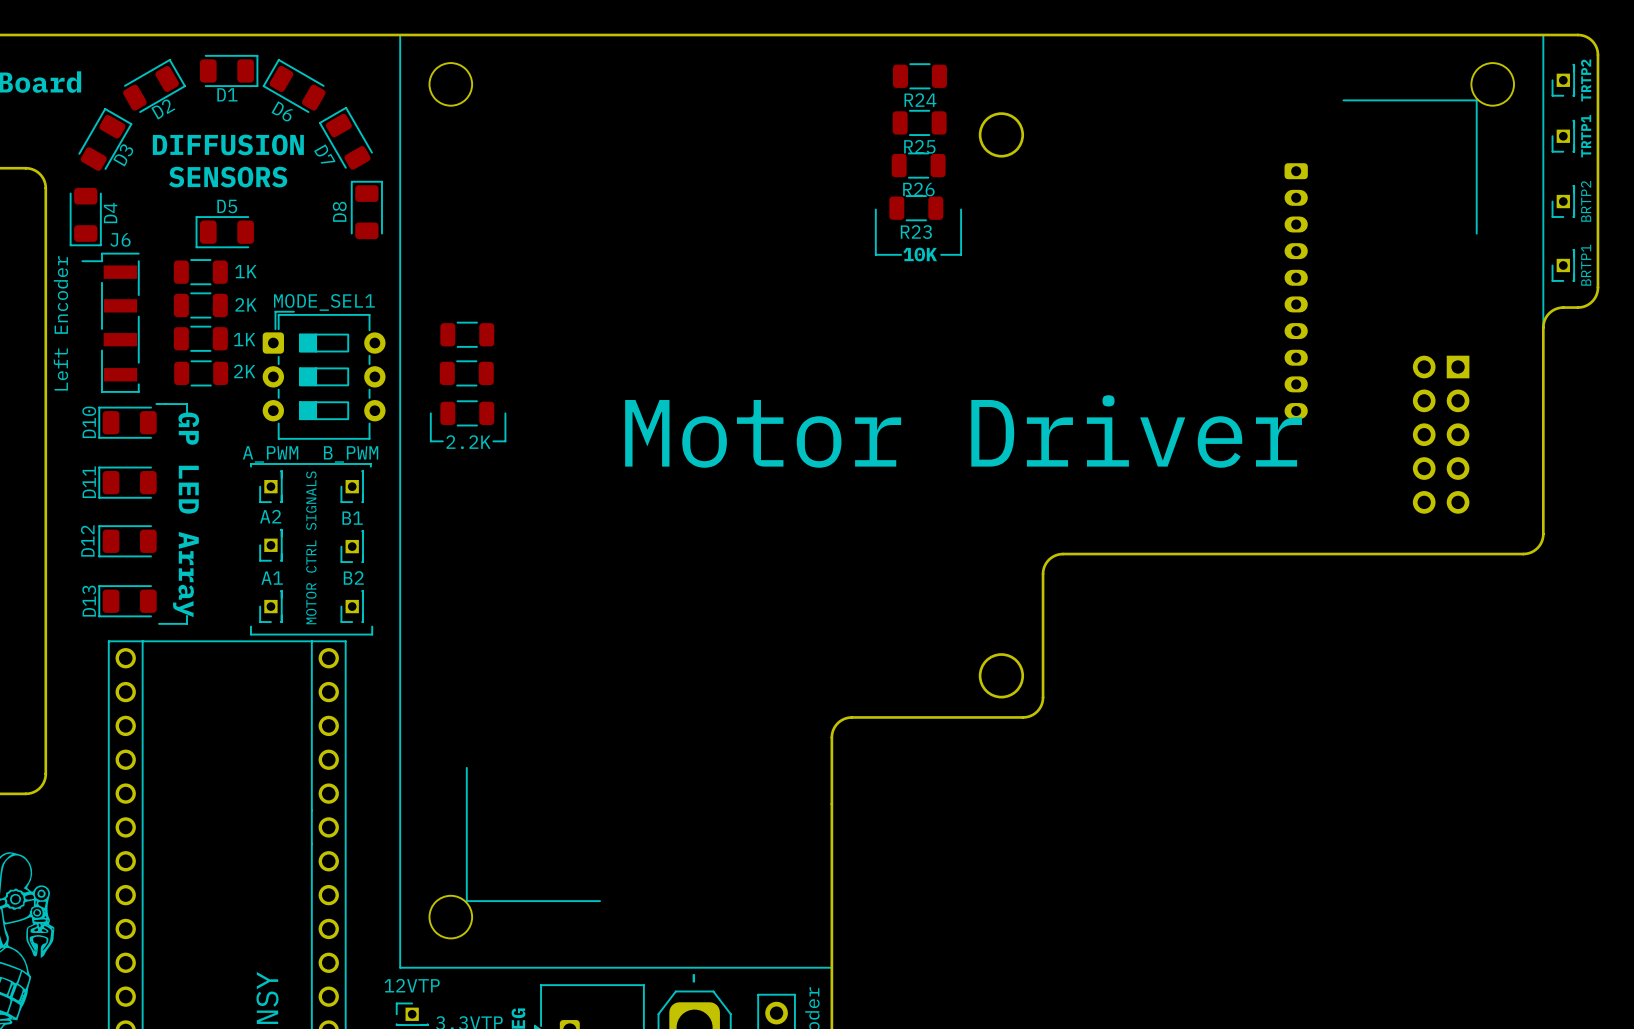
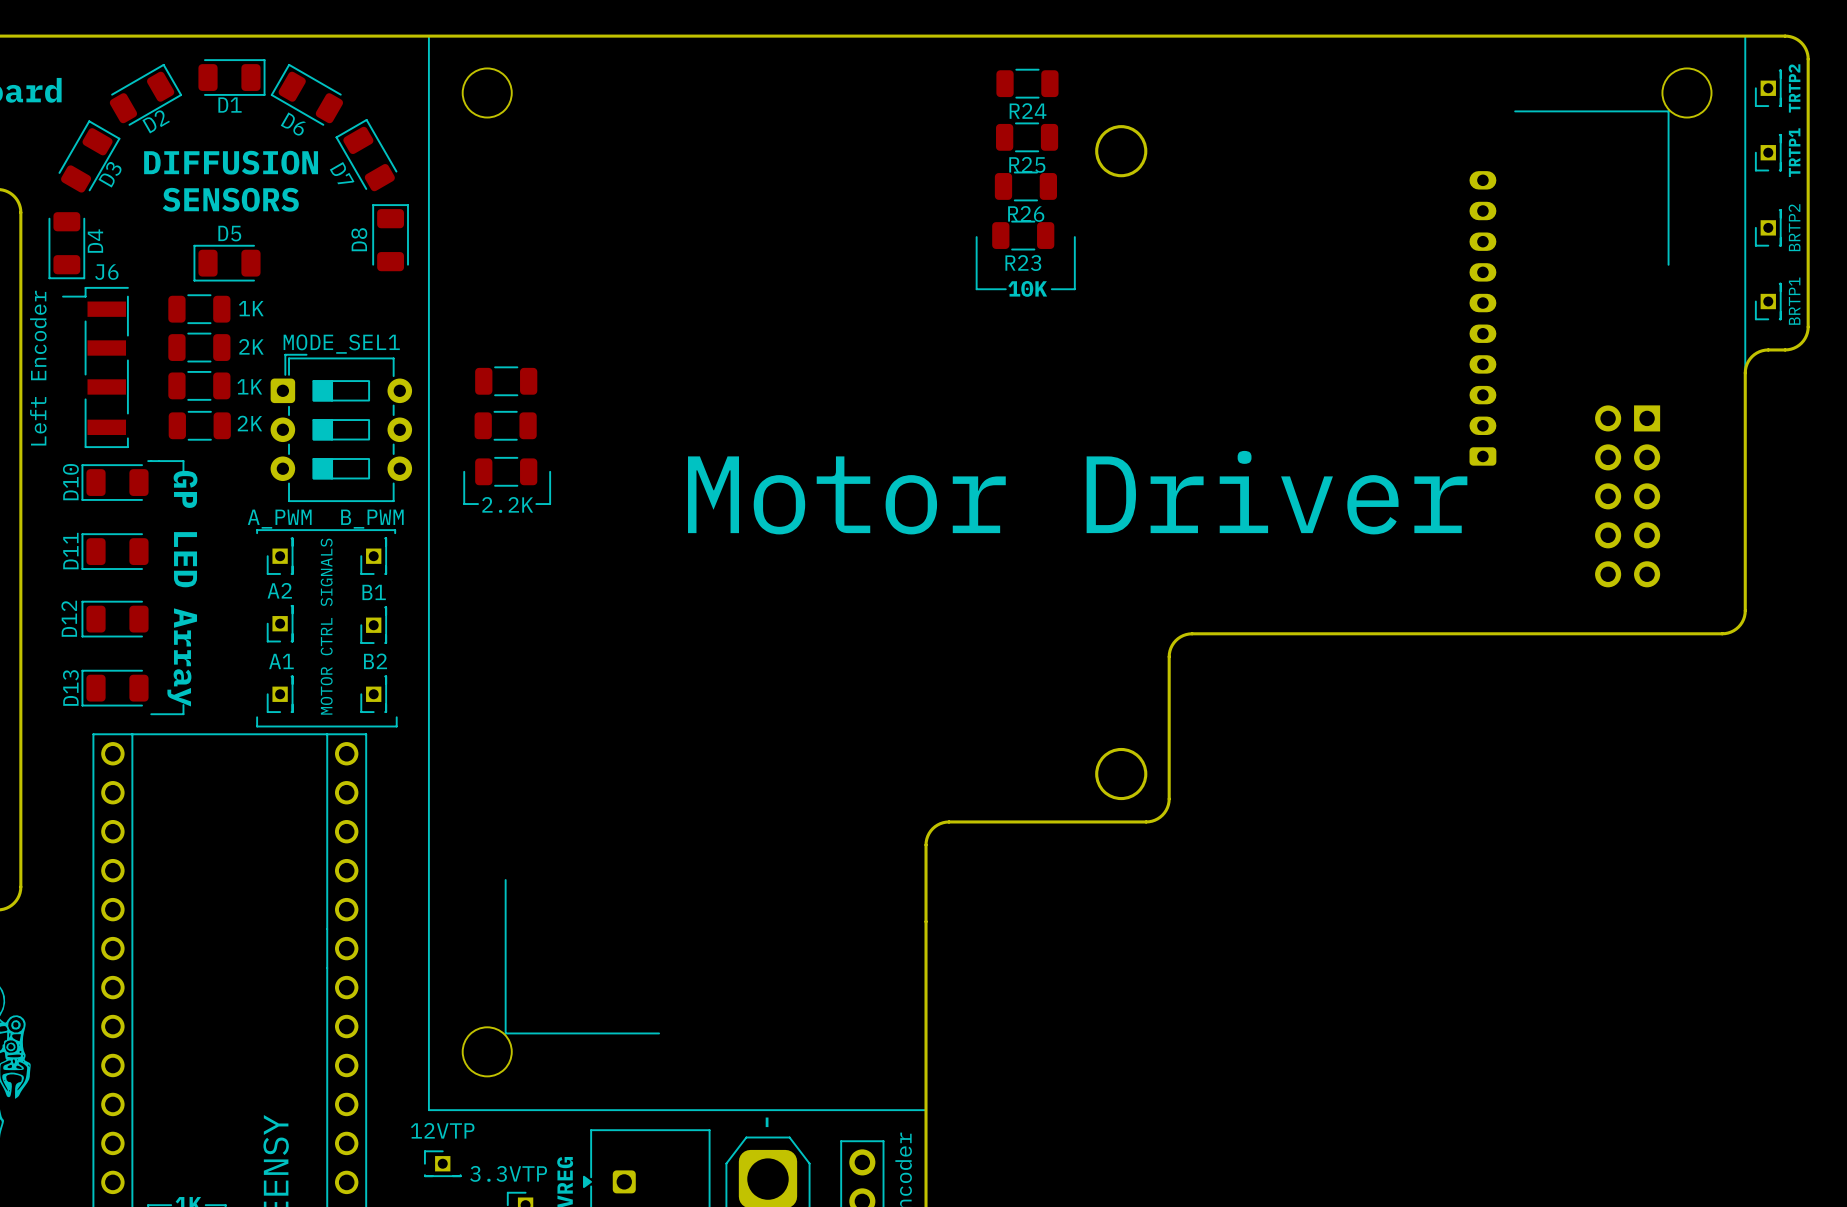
part rotation: 0° (1296, 291) -> 180° (1482, 318)

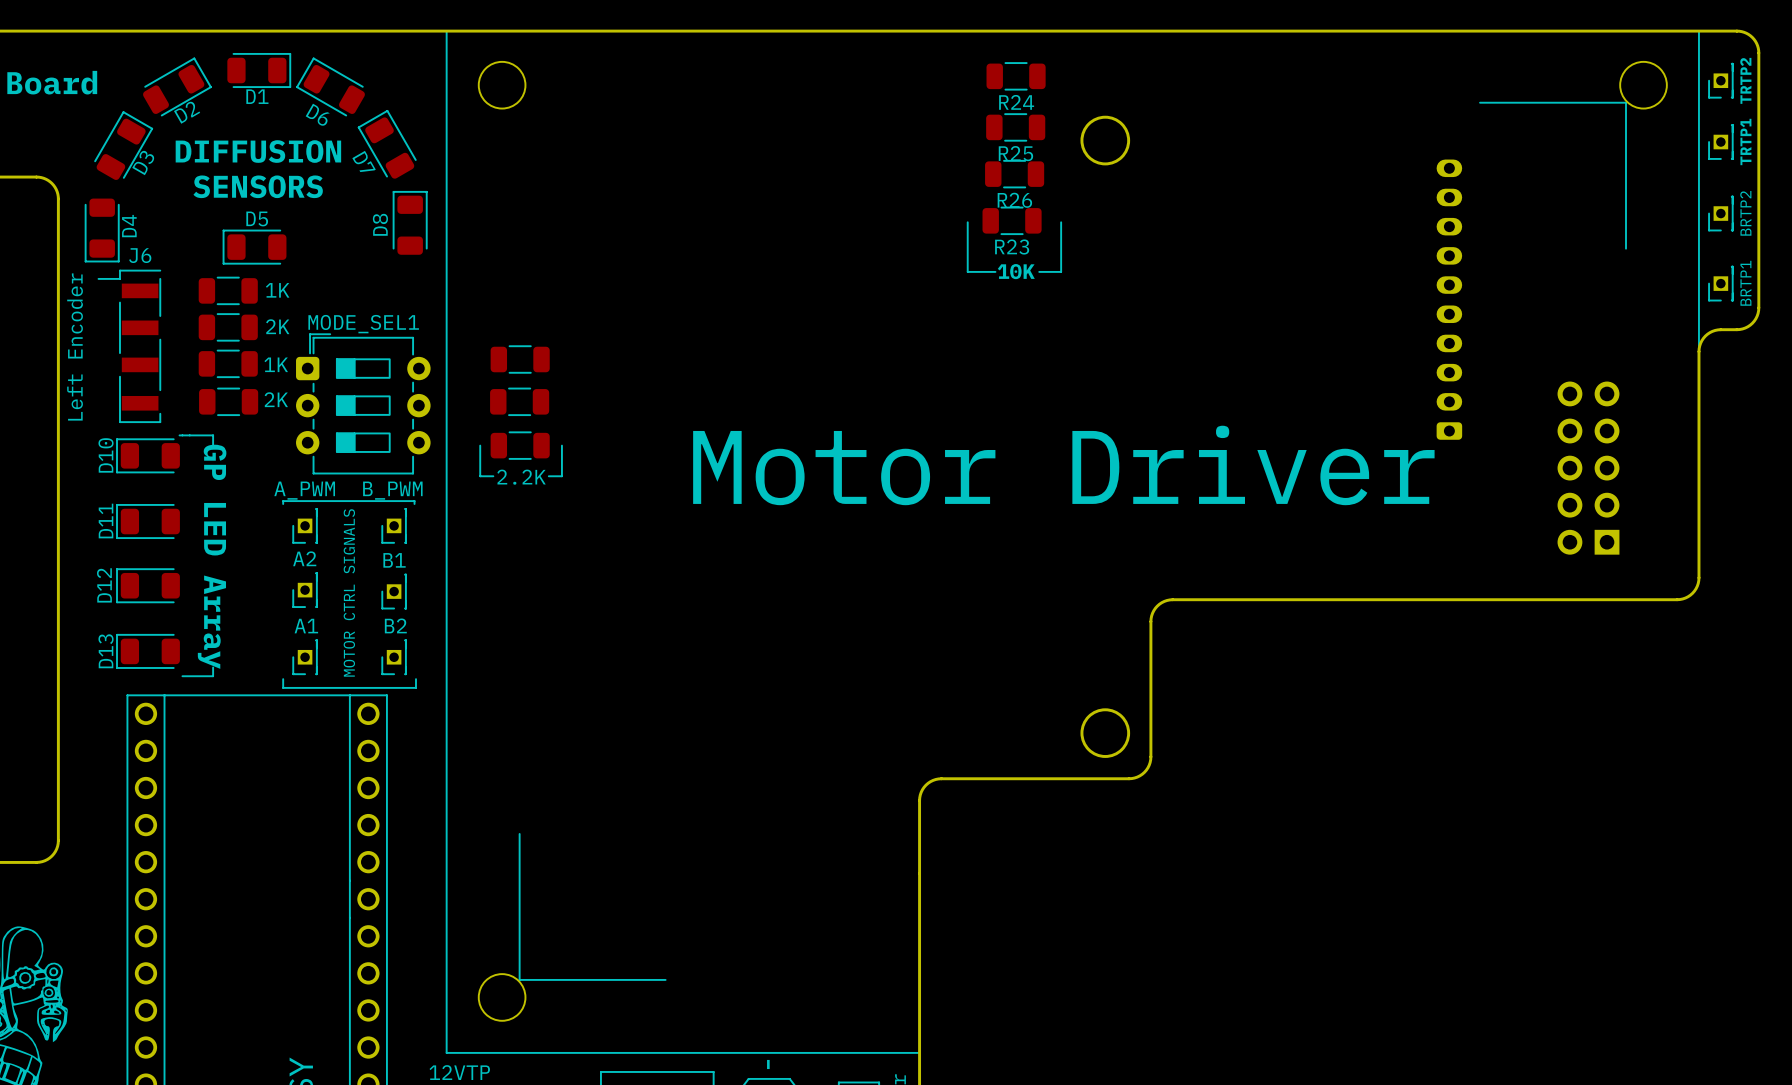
part side: bottom (1627, 496) -> top (1588, 468)

